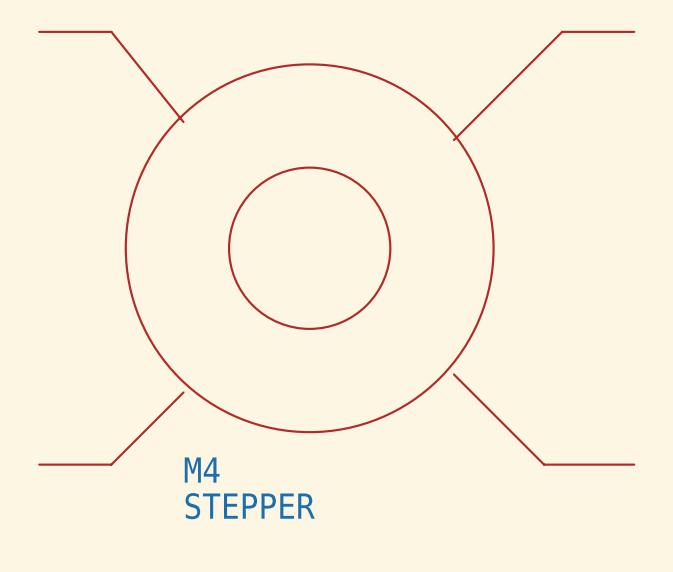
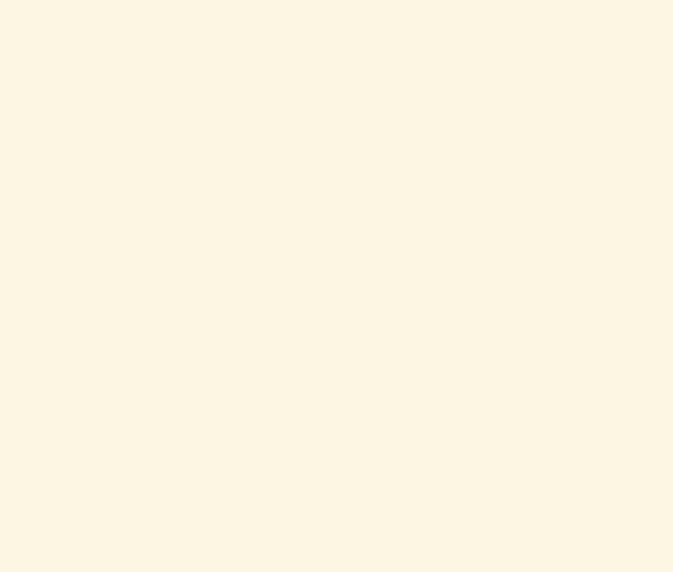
line: (39, 31) (111, 31) (183, 122) -> none
line: (634, 31) (562, 31) (453, 140) -> none
drawing: [124, 63, 495, 434] -> none
line: (453, 374) (544, 464) (634, 464) -> none
line: (183, 392) (111, 464) (39, 464) -> none
text: M4 (202, 470) -> none
text: STEPPER (250, 506) -> none

